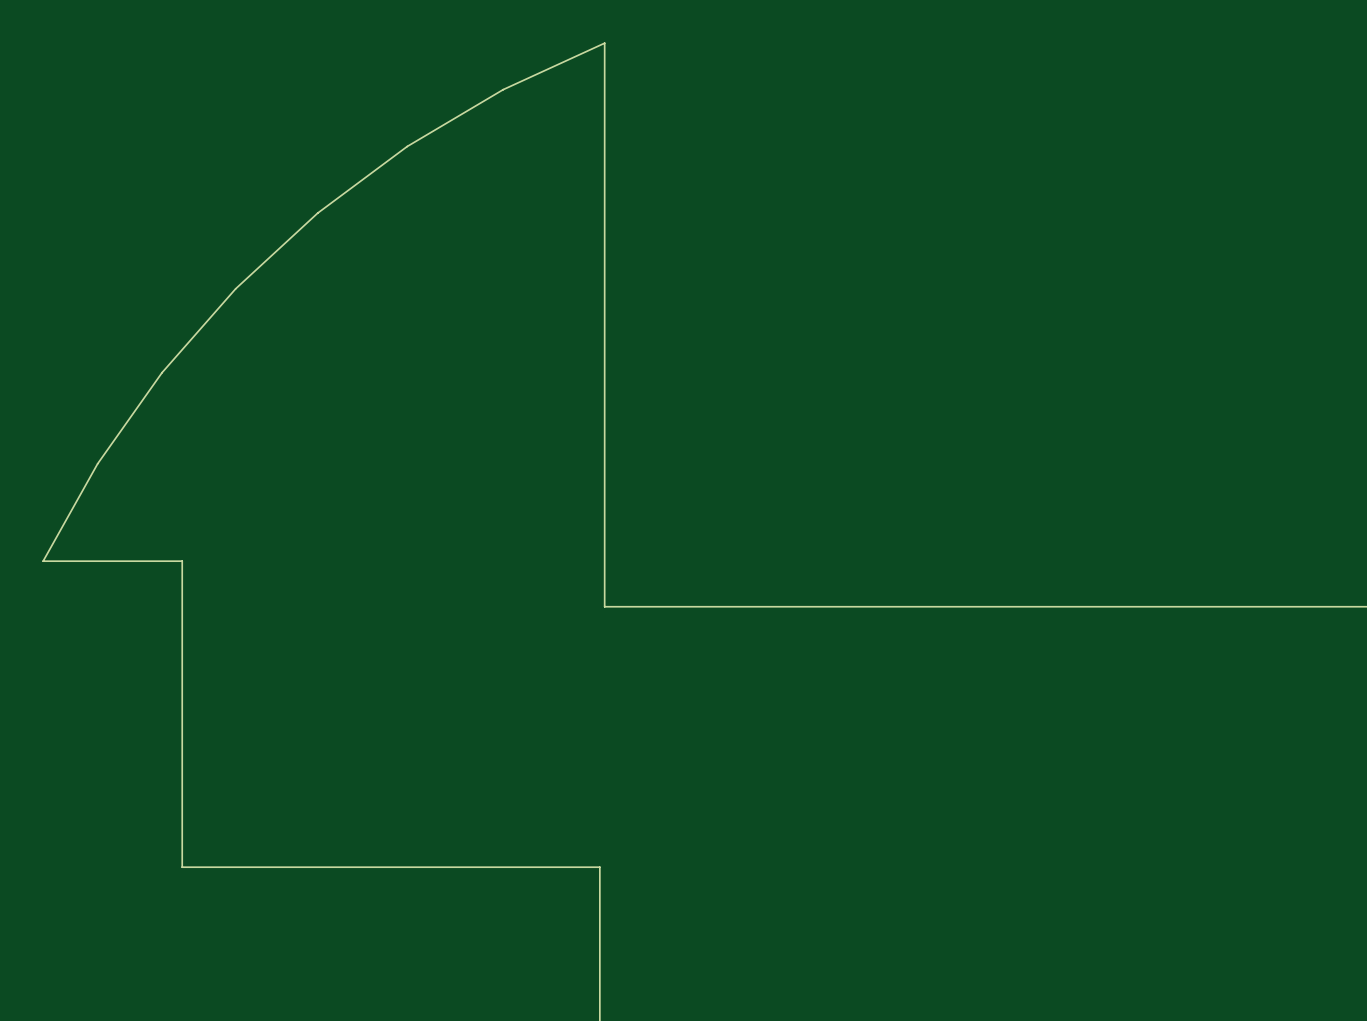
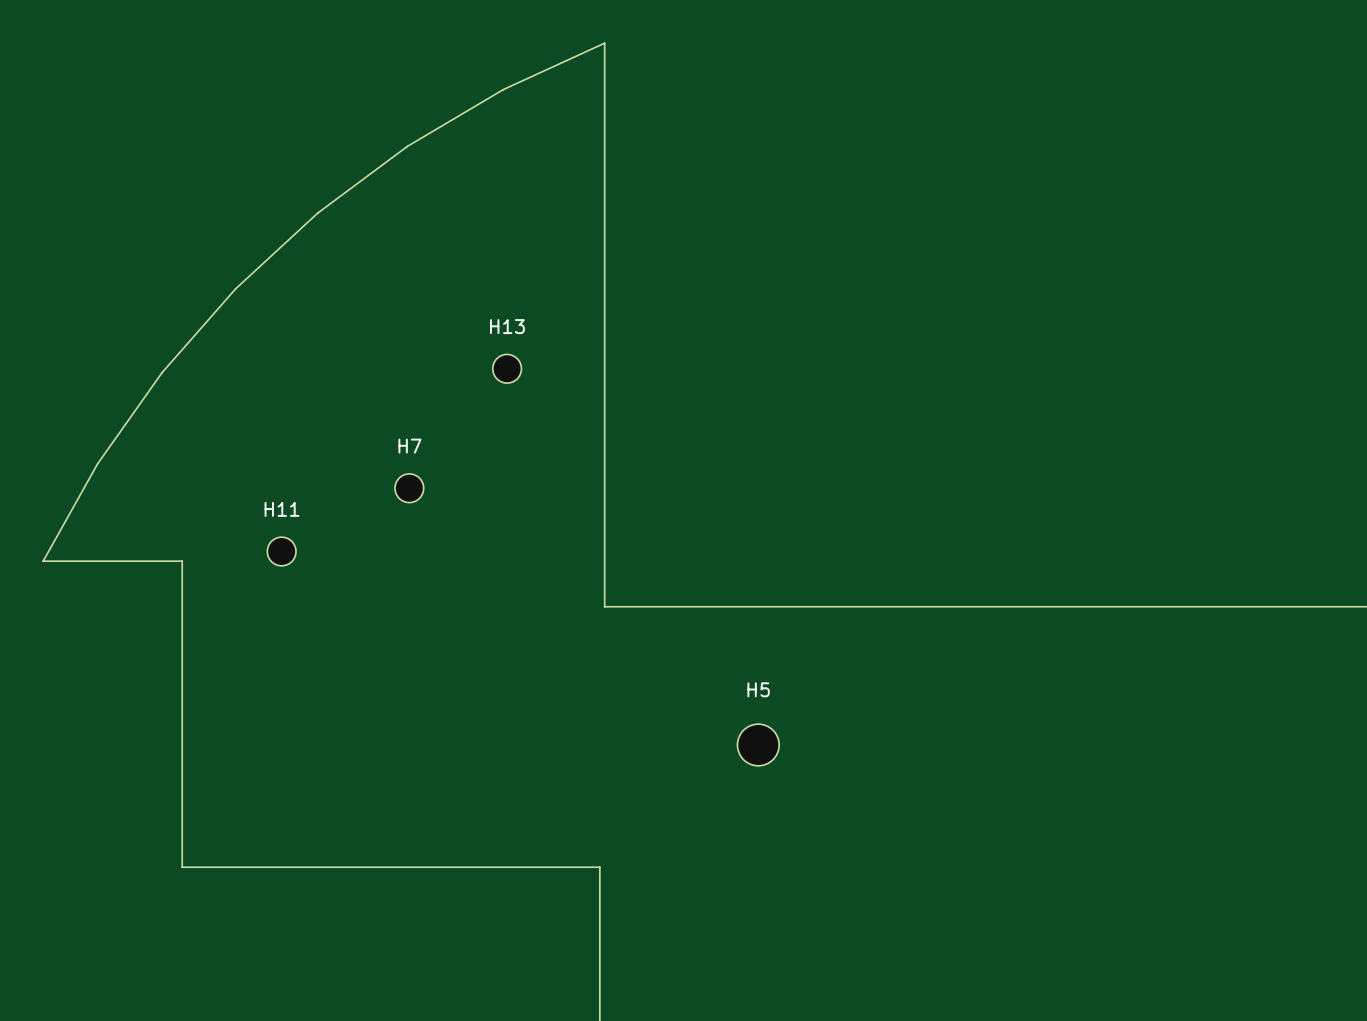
H13: none -> (507, 368)
H7: none -> (409, 488)
H11: none -> (281, 551)
H5: none -> (758, 744)

